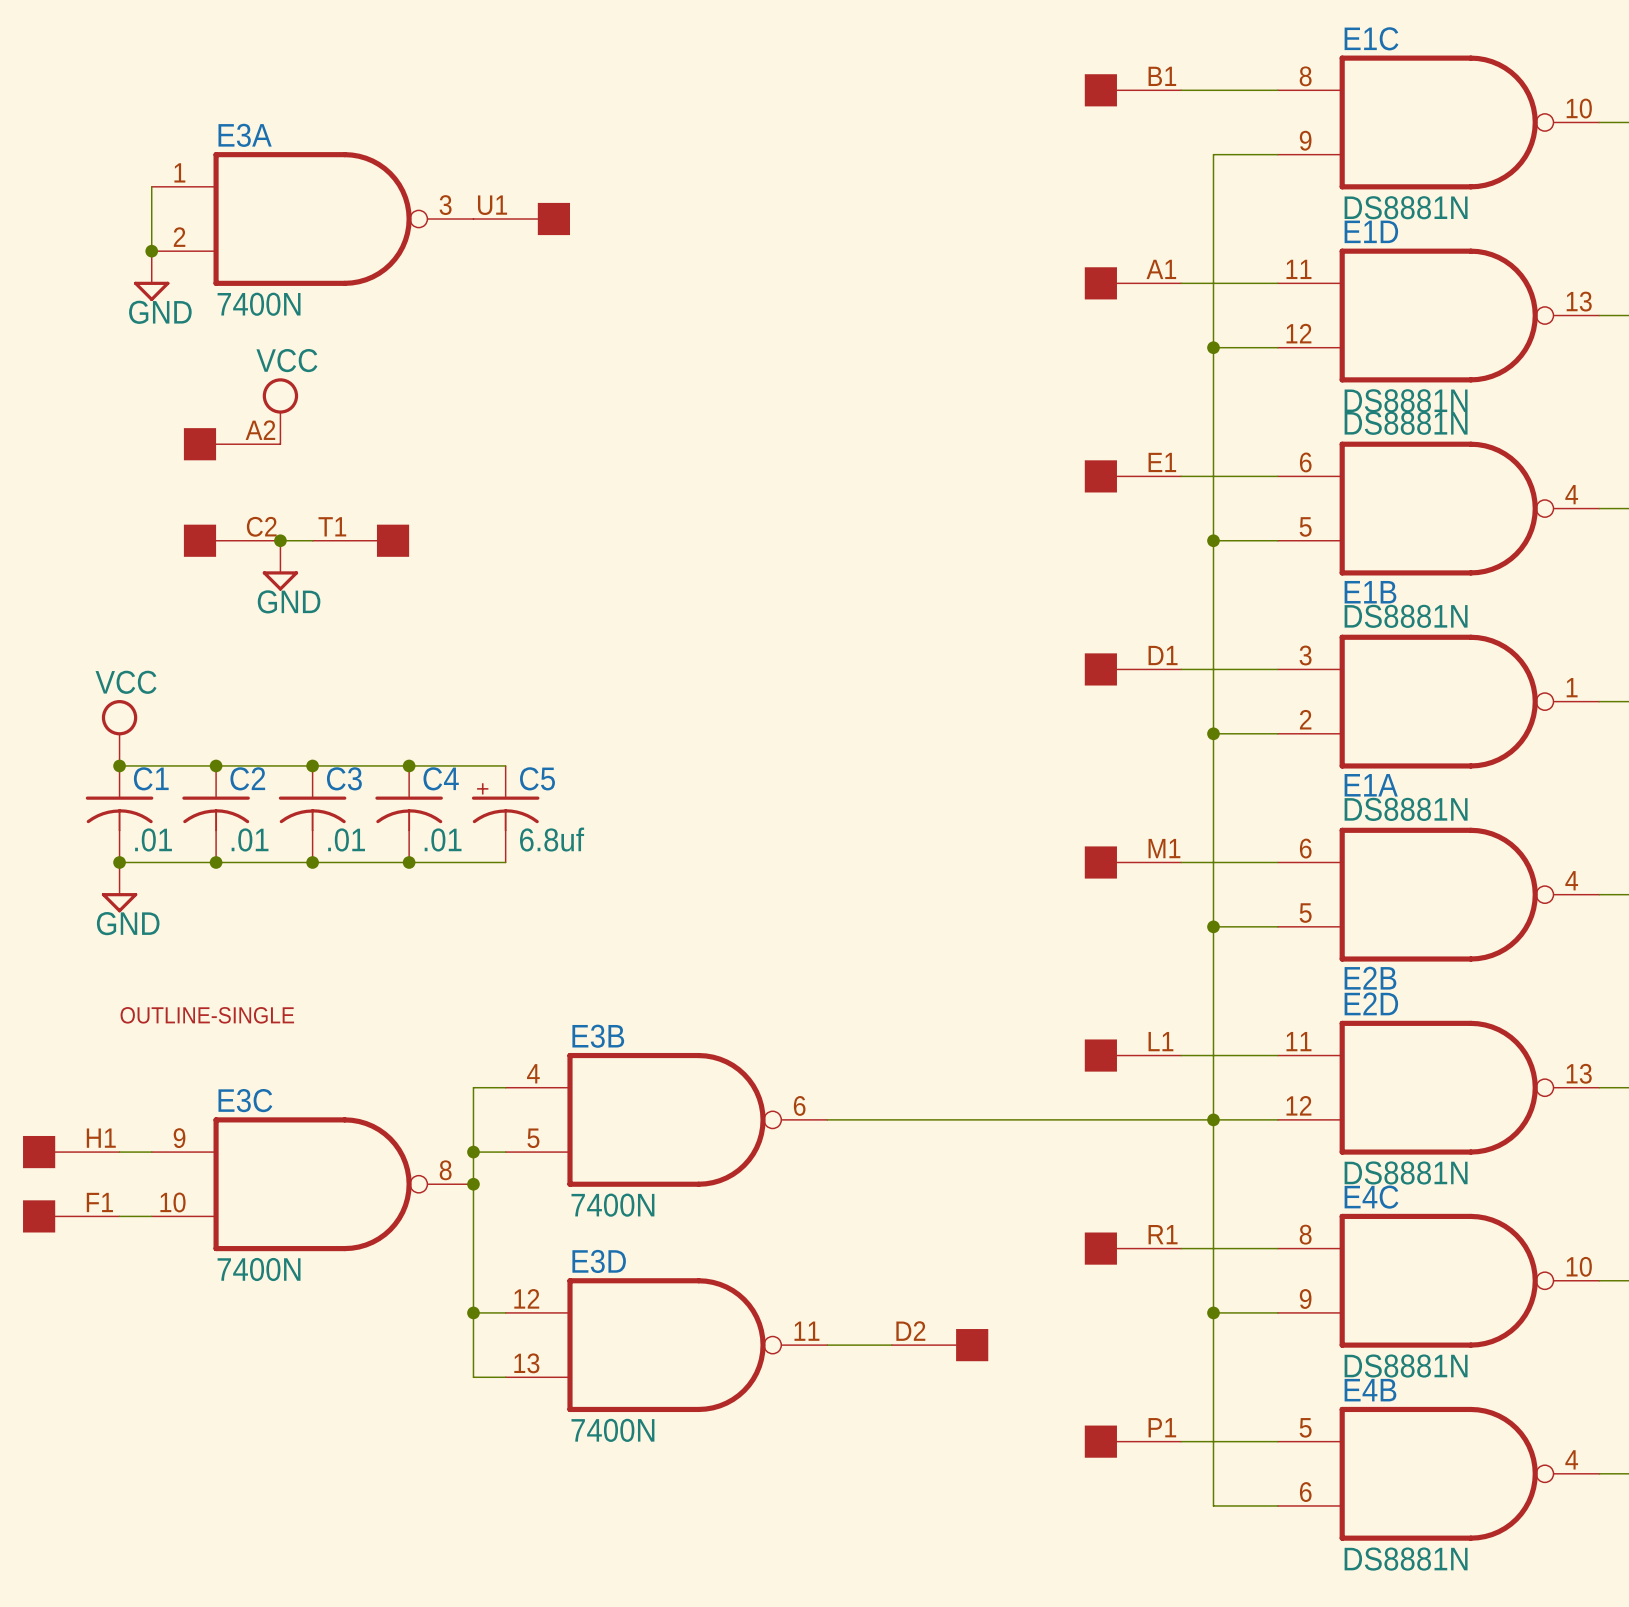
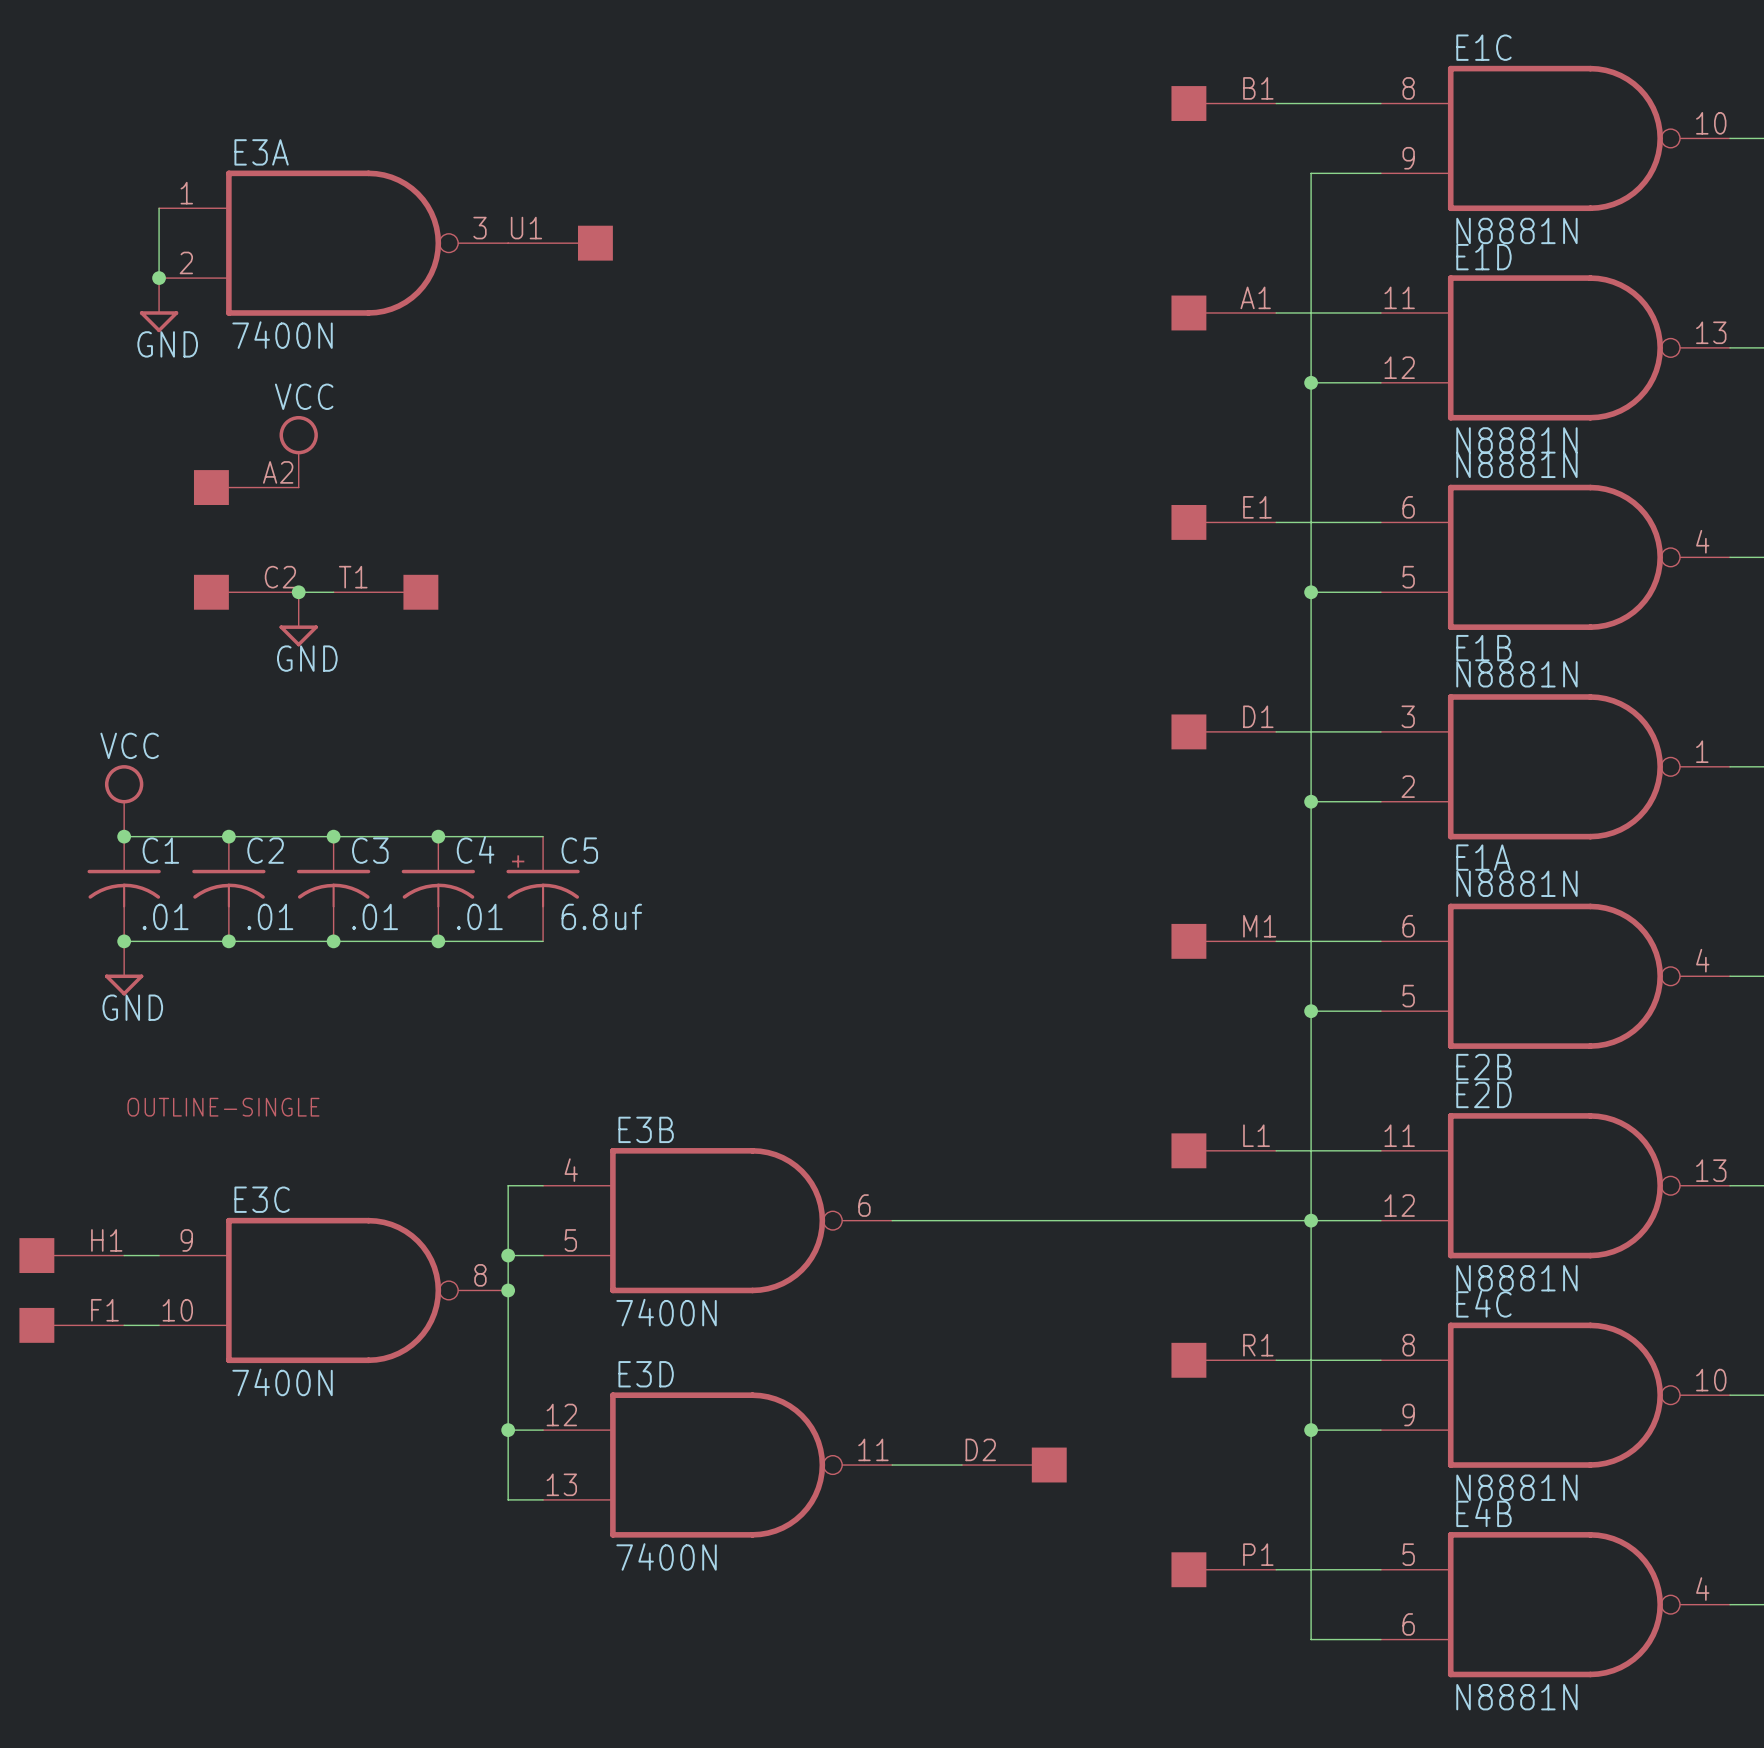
E1C value: DS8881N (1406, 207) -> N8881N (1516, 230)
E1D value: DS8881N (1406, 400) -> N8881N (1516, 440)
E1B value: DS8881N (1406, 423) -> N8881N (1516, 464)
E1A value: DS8881N (1406, 616) -> N8881N (1516, 674)
E2B value: DS8881N (1406, 809) -> N8881N (1516, 883)
E2D value: DS8881N (1406, 1172) -> N8881N (1516, 1278)
E4C value: DS8881N (1406, 1366) -> N8881N (1516, 1487)
E4B value: DS8881N (1406, 1559) -> N8881N (1516, 1697)

